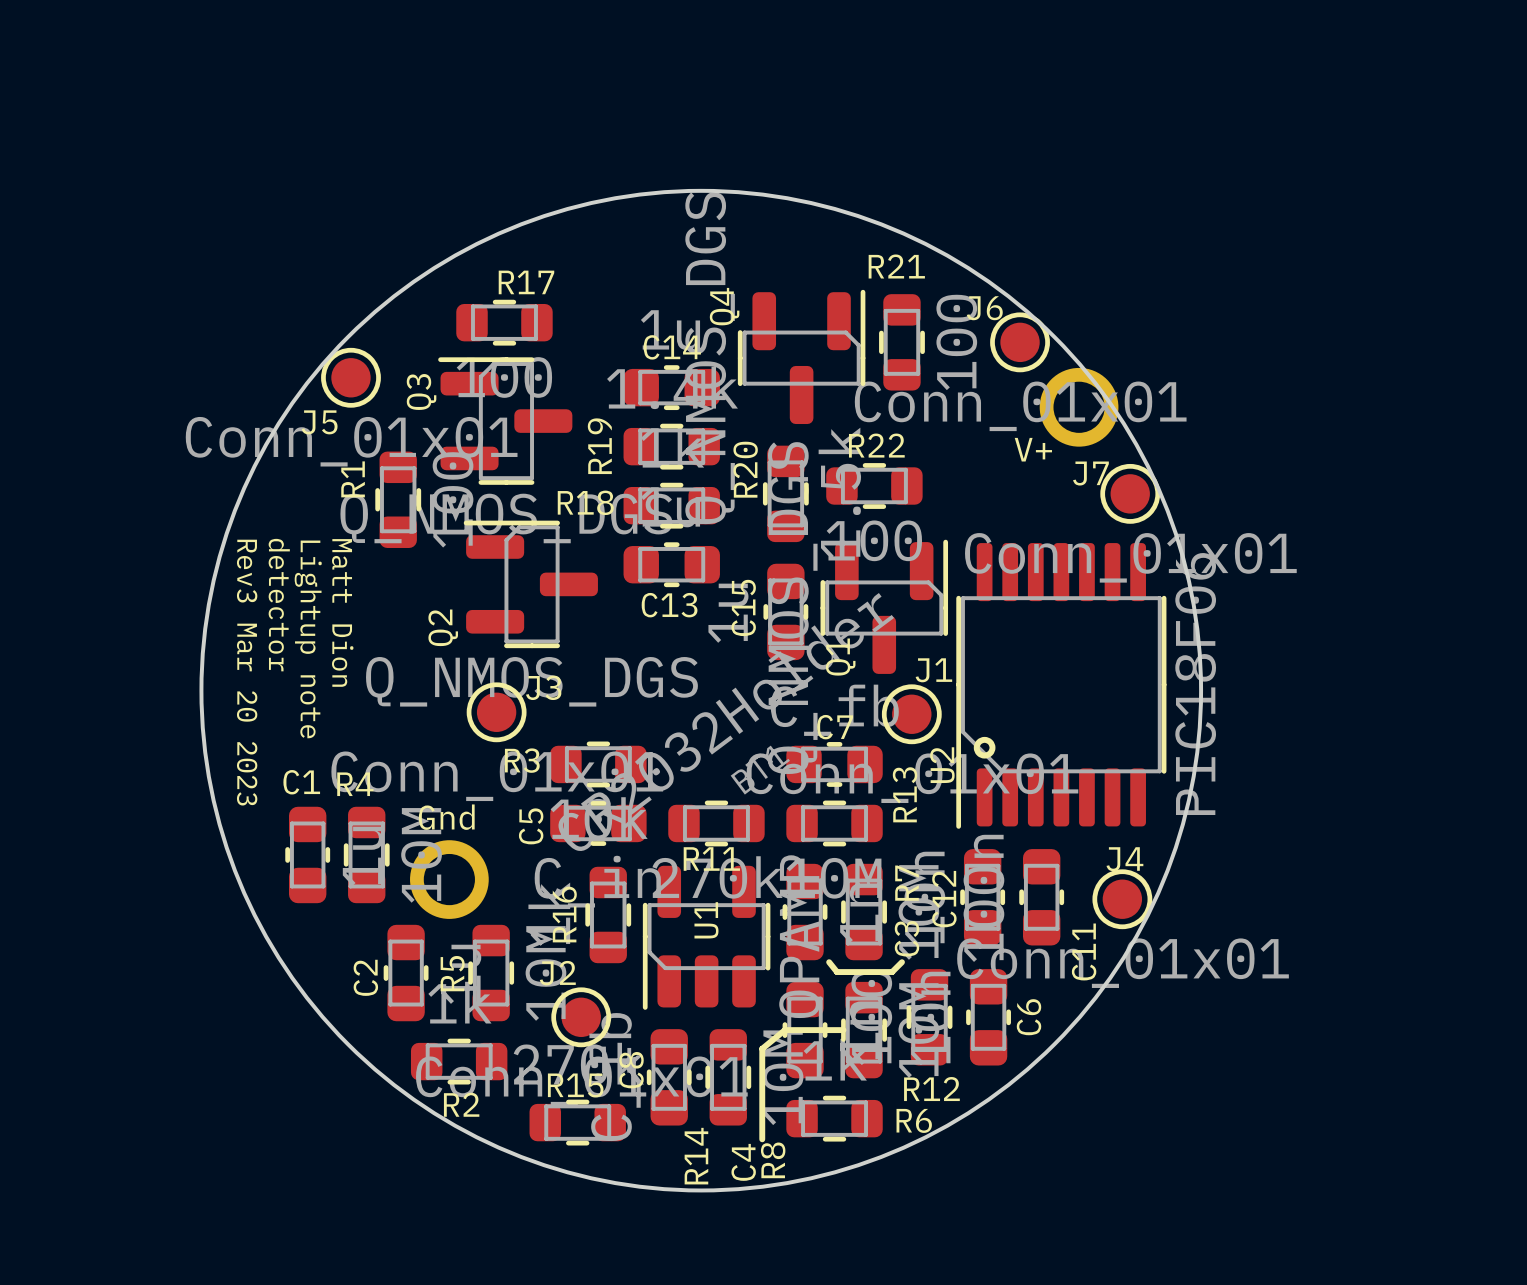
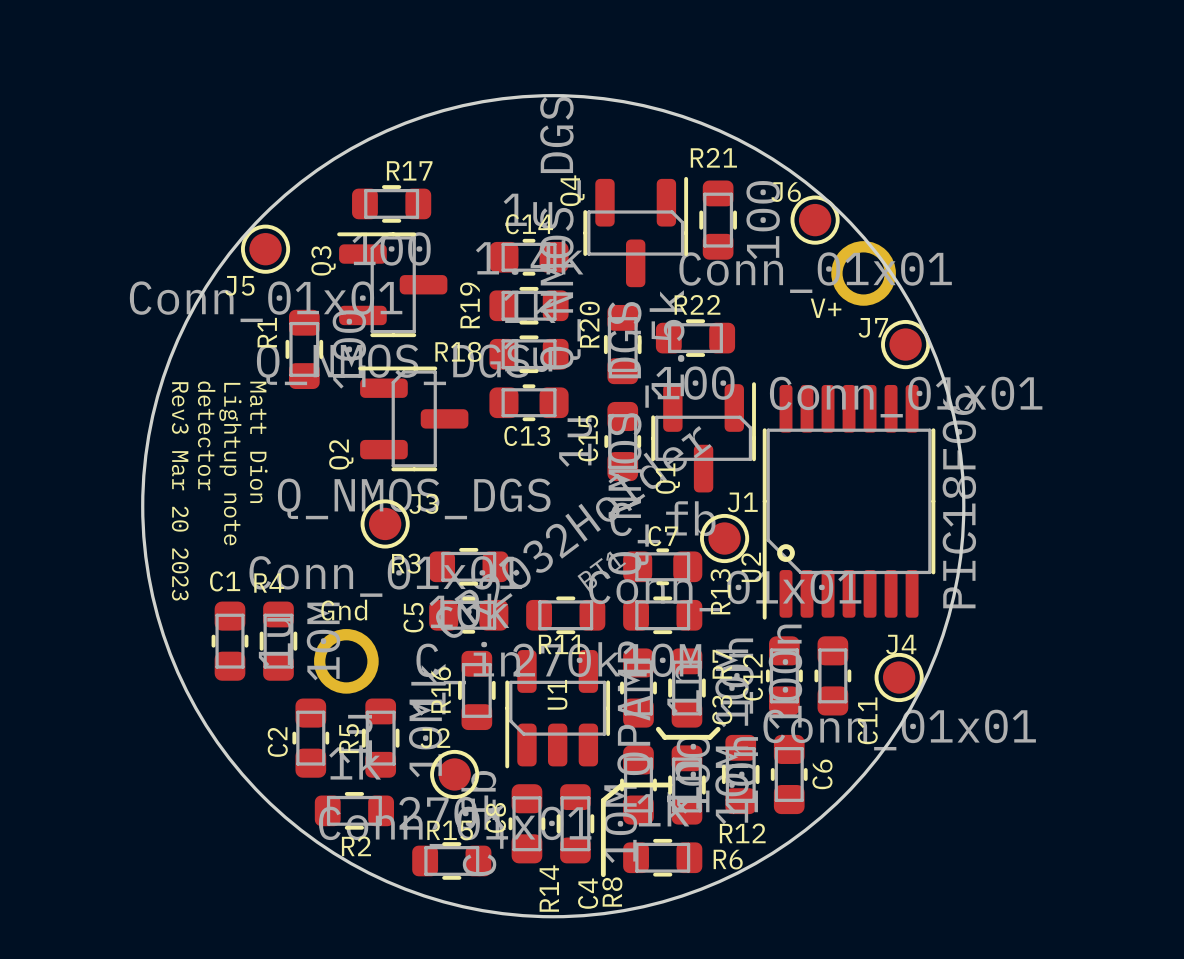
J1 position: (911, 714) -> (724, 538)

